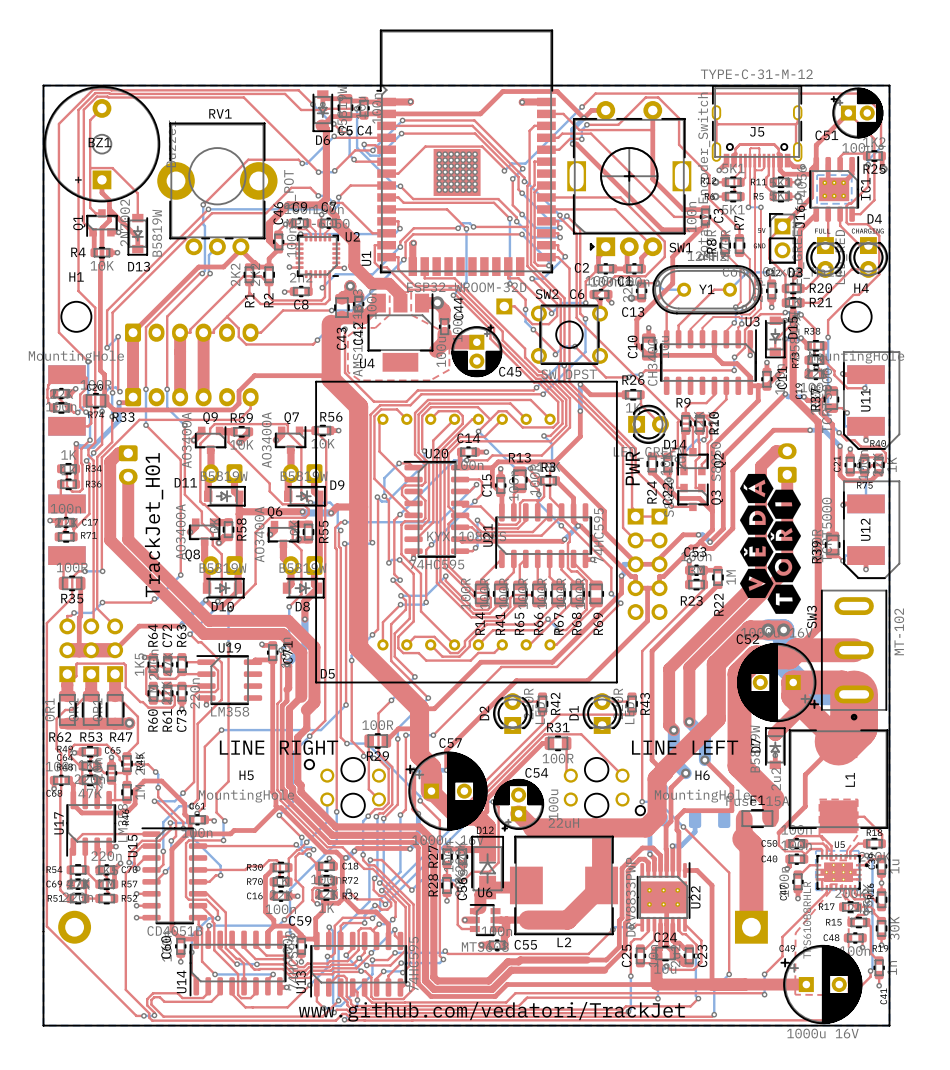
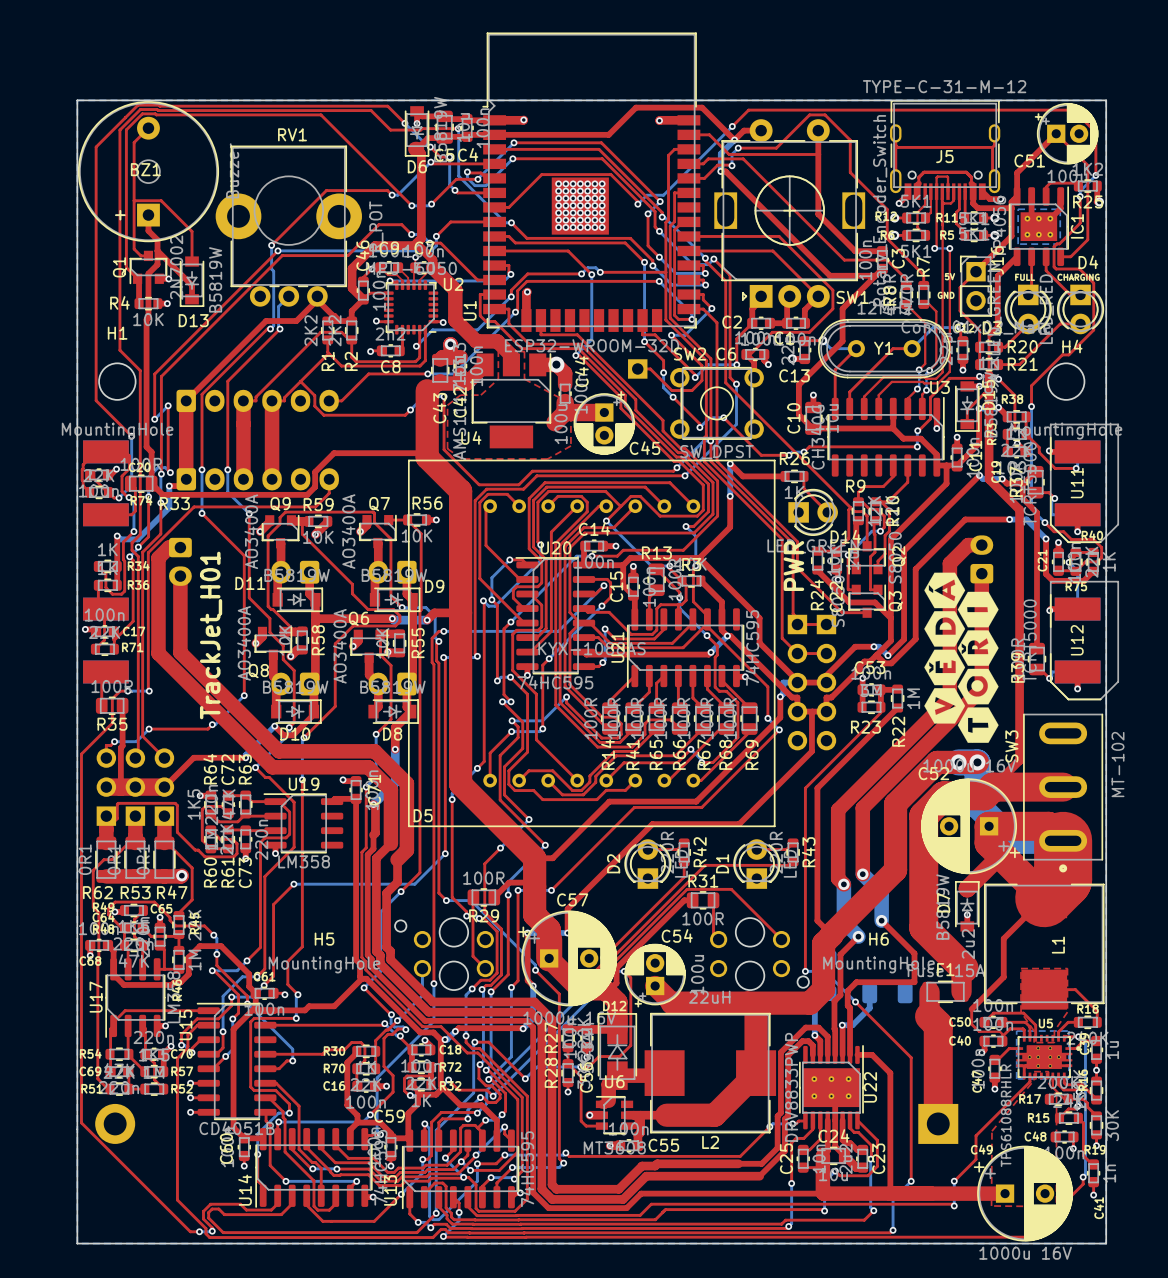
text: LINE RIGHT LINE LEFT (479, 747) -> none
text: www.github.com/vedatori/TrackJet (491, 1011) -> none

